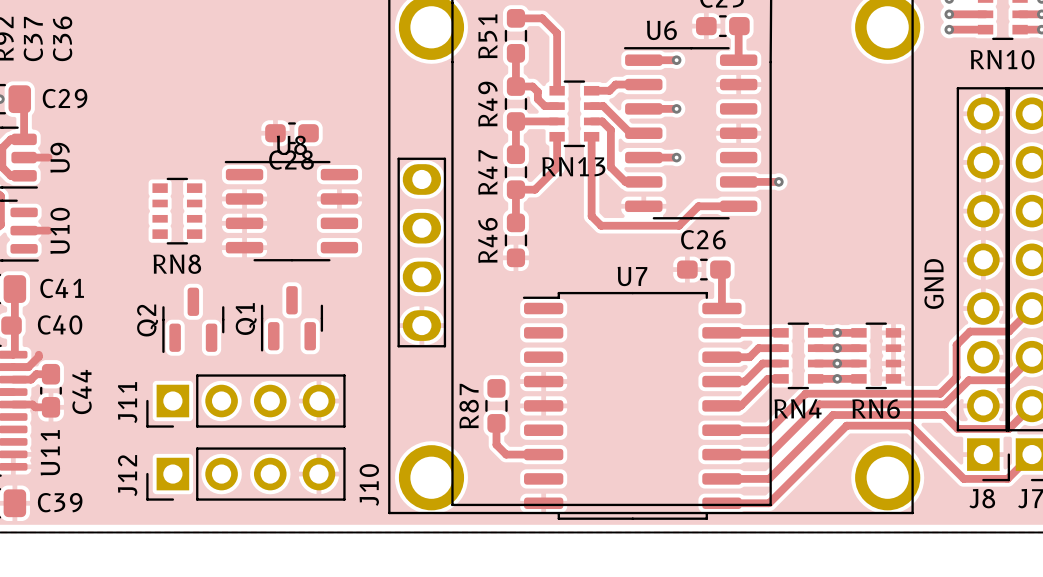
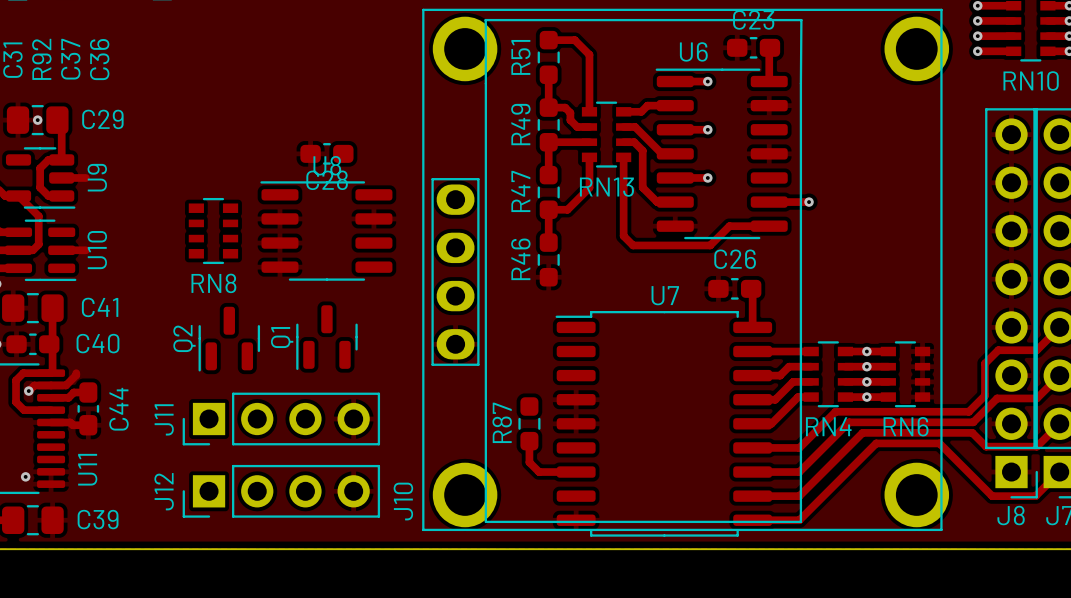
text: GND (934, 283) -> none

